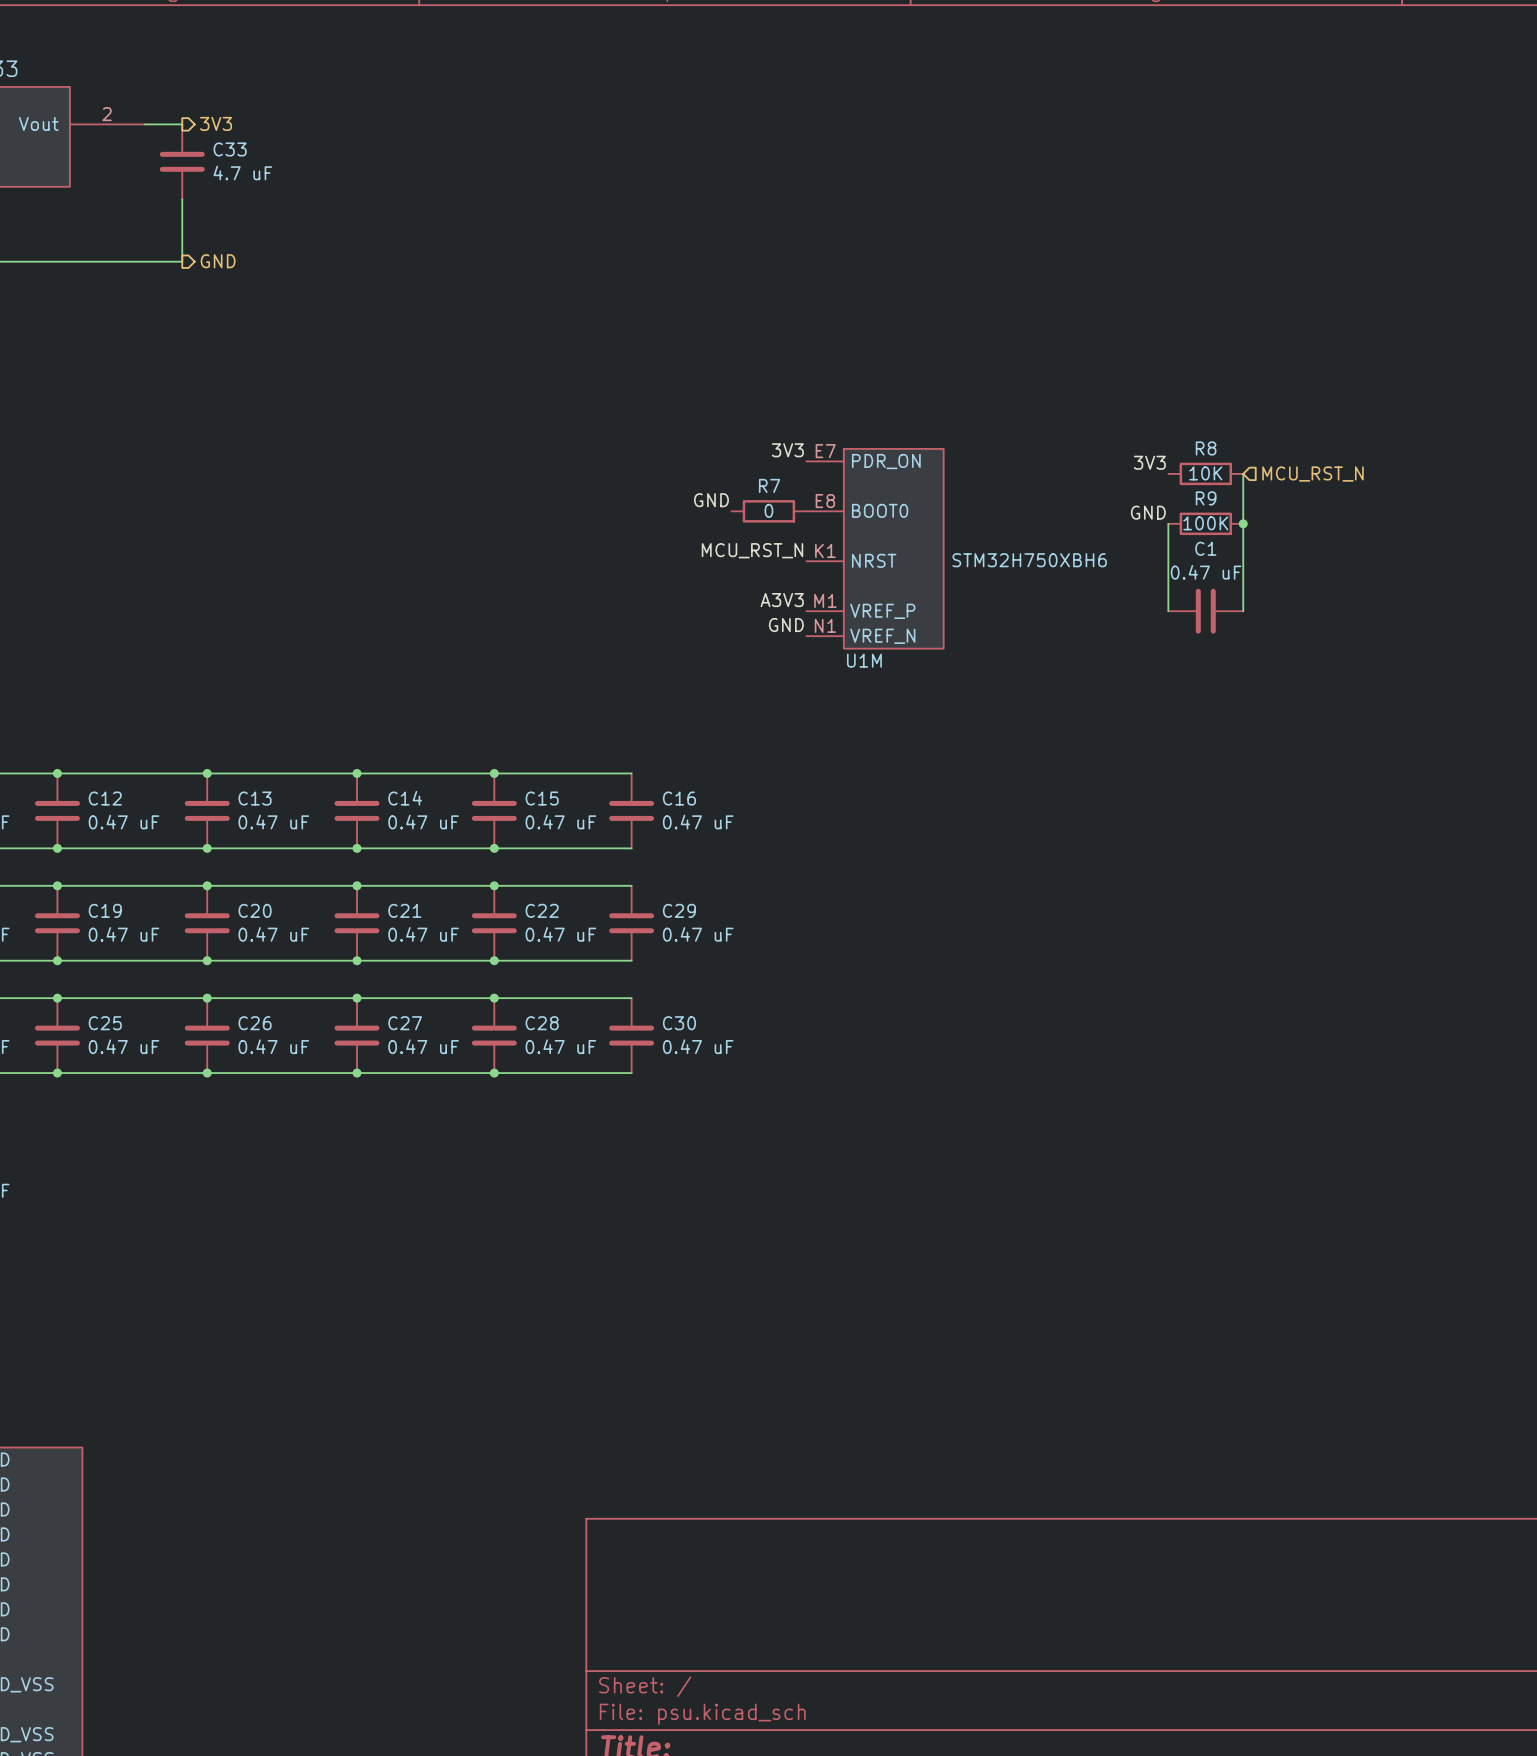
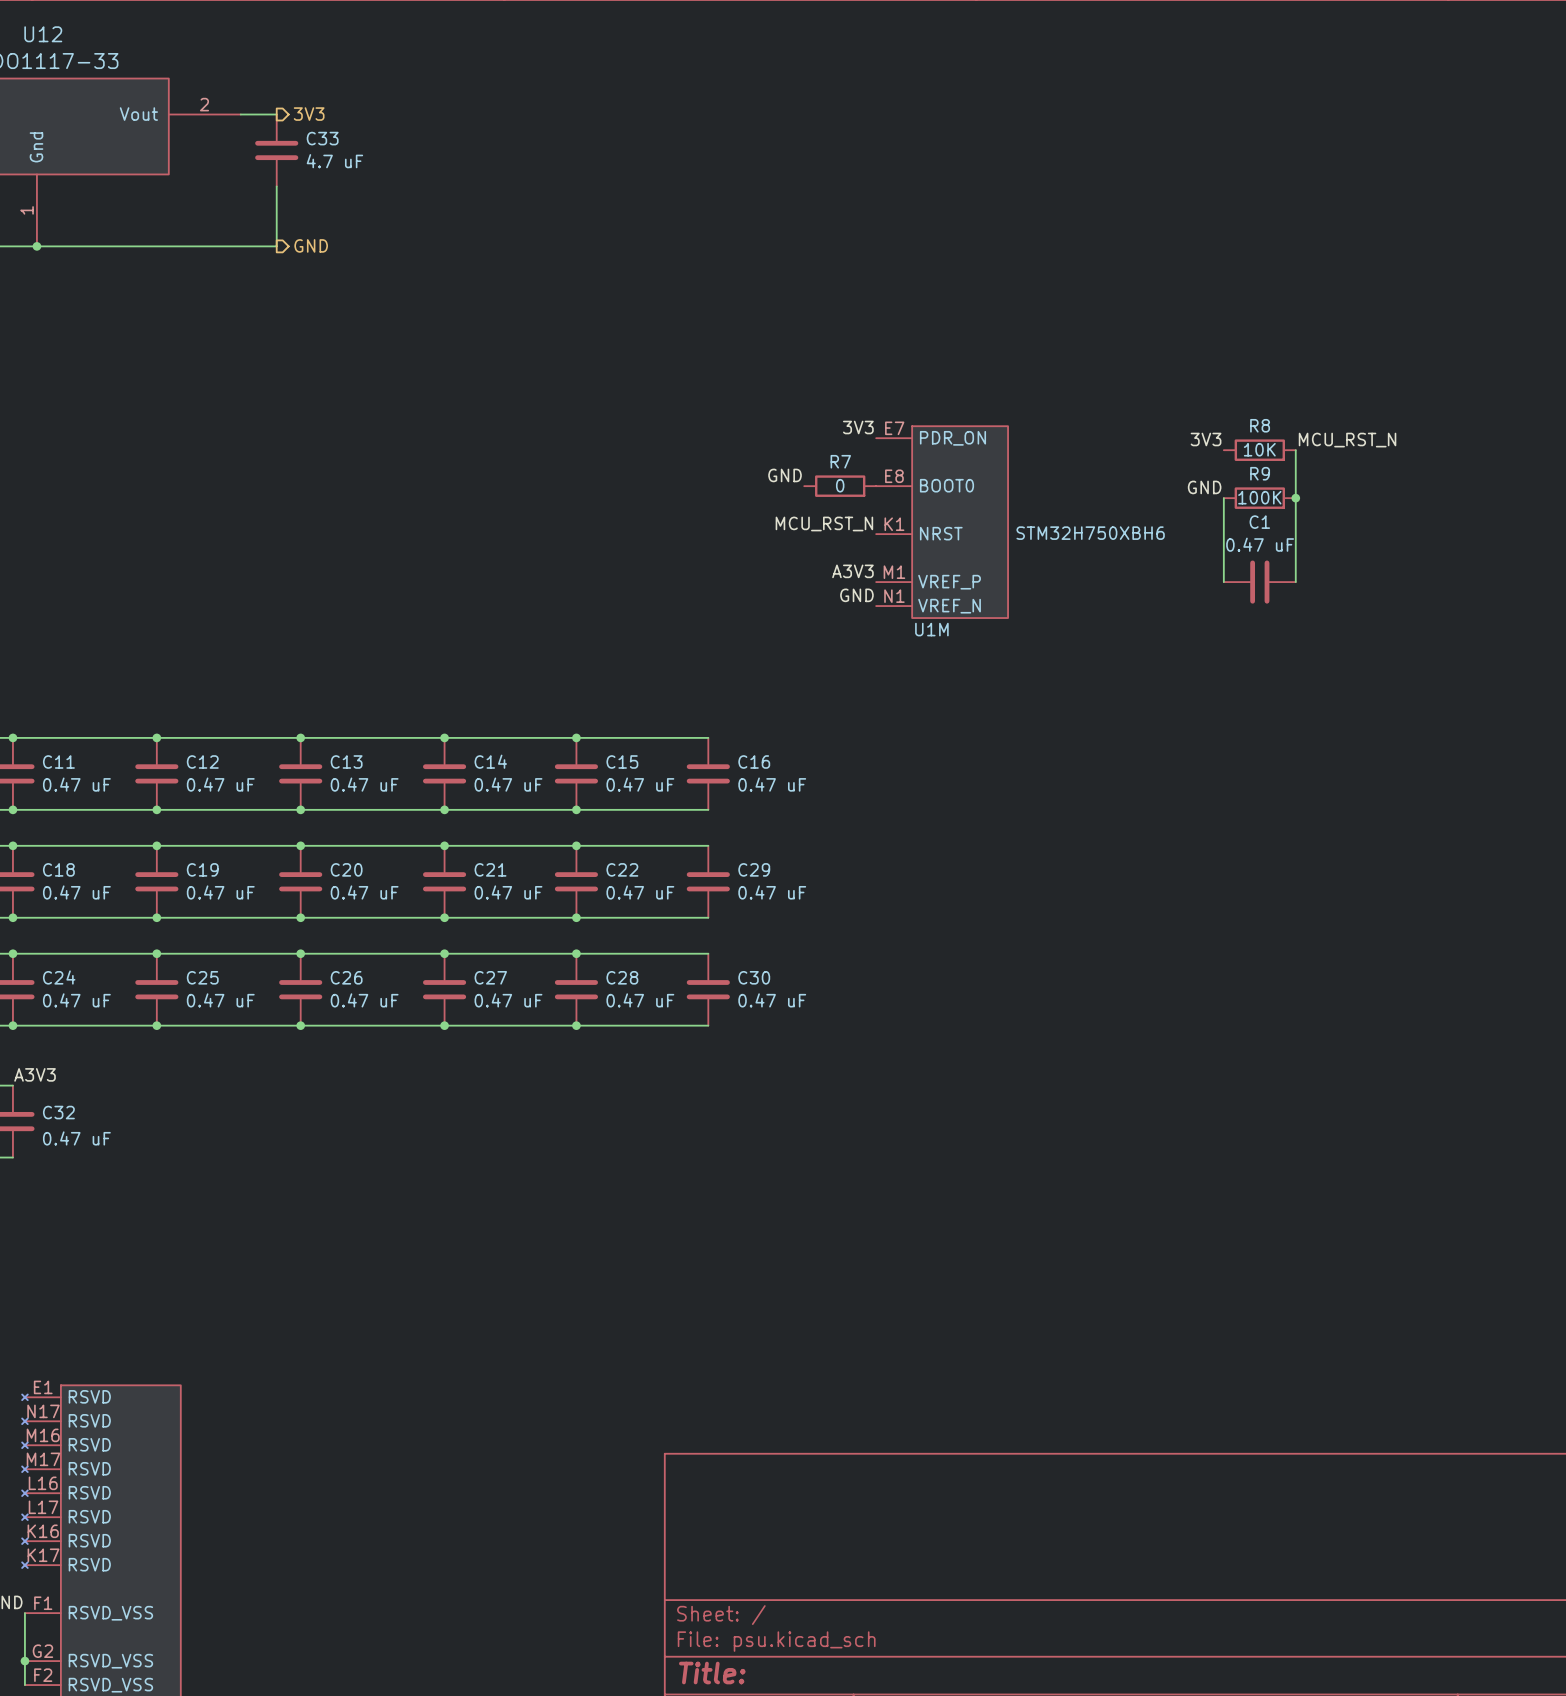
label: none -> MCU_RST_N (1347, 440)
hierarchical label: MCU_RST_N (1312, 474) -> none

